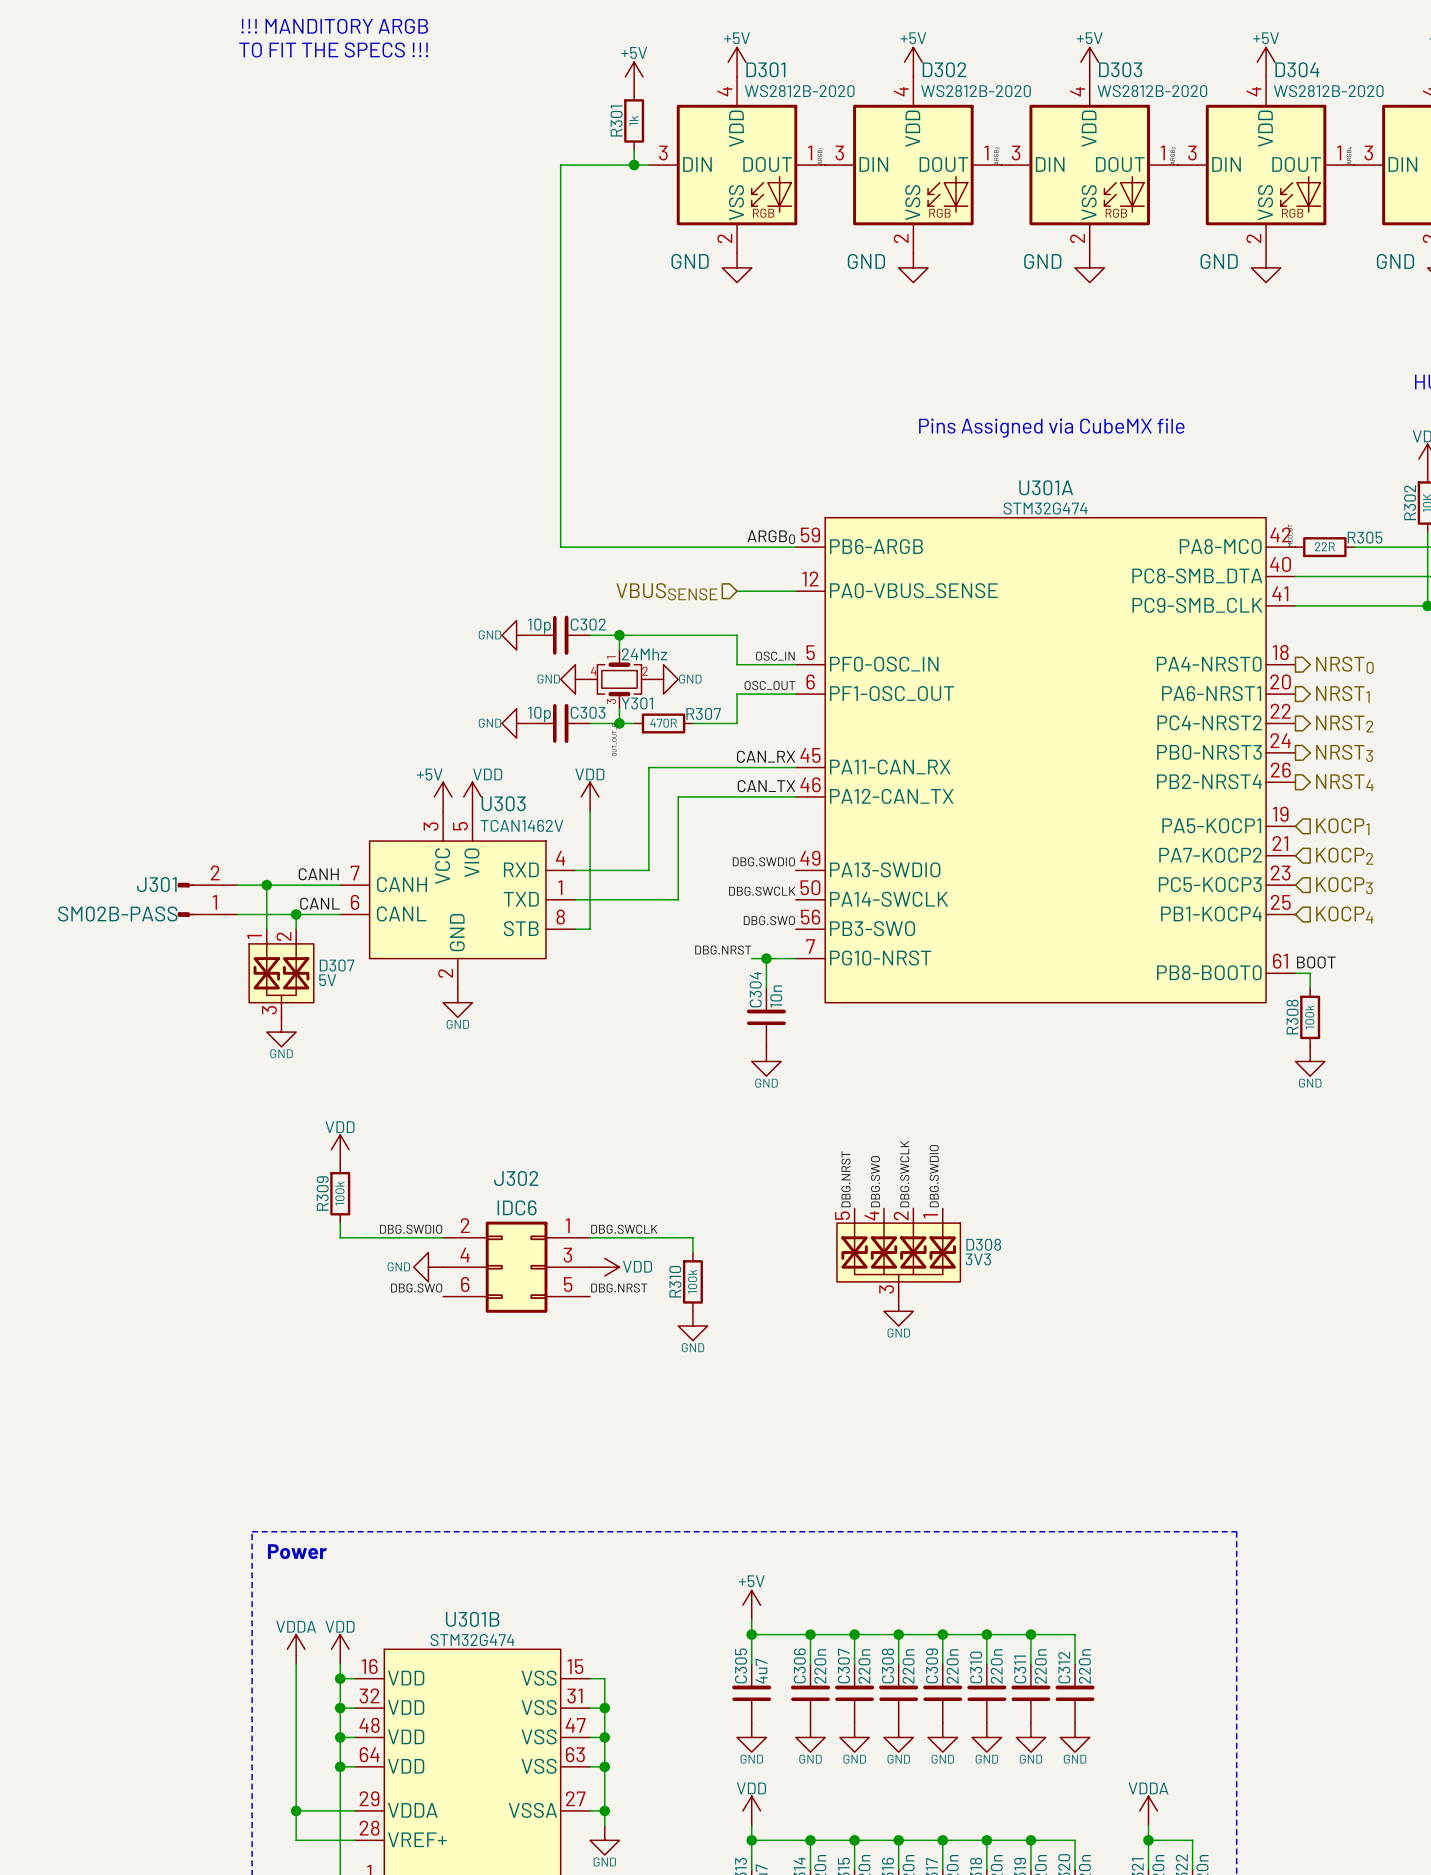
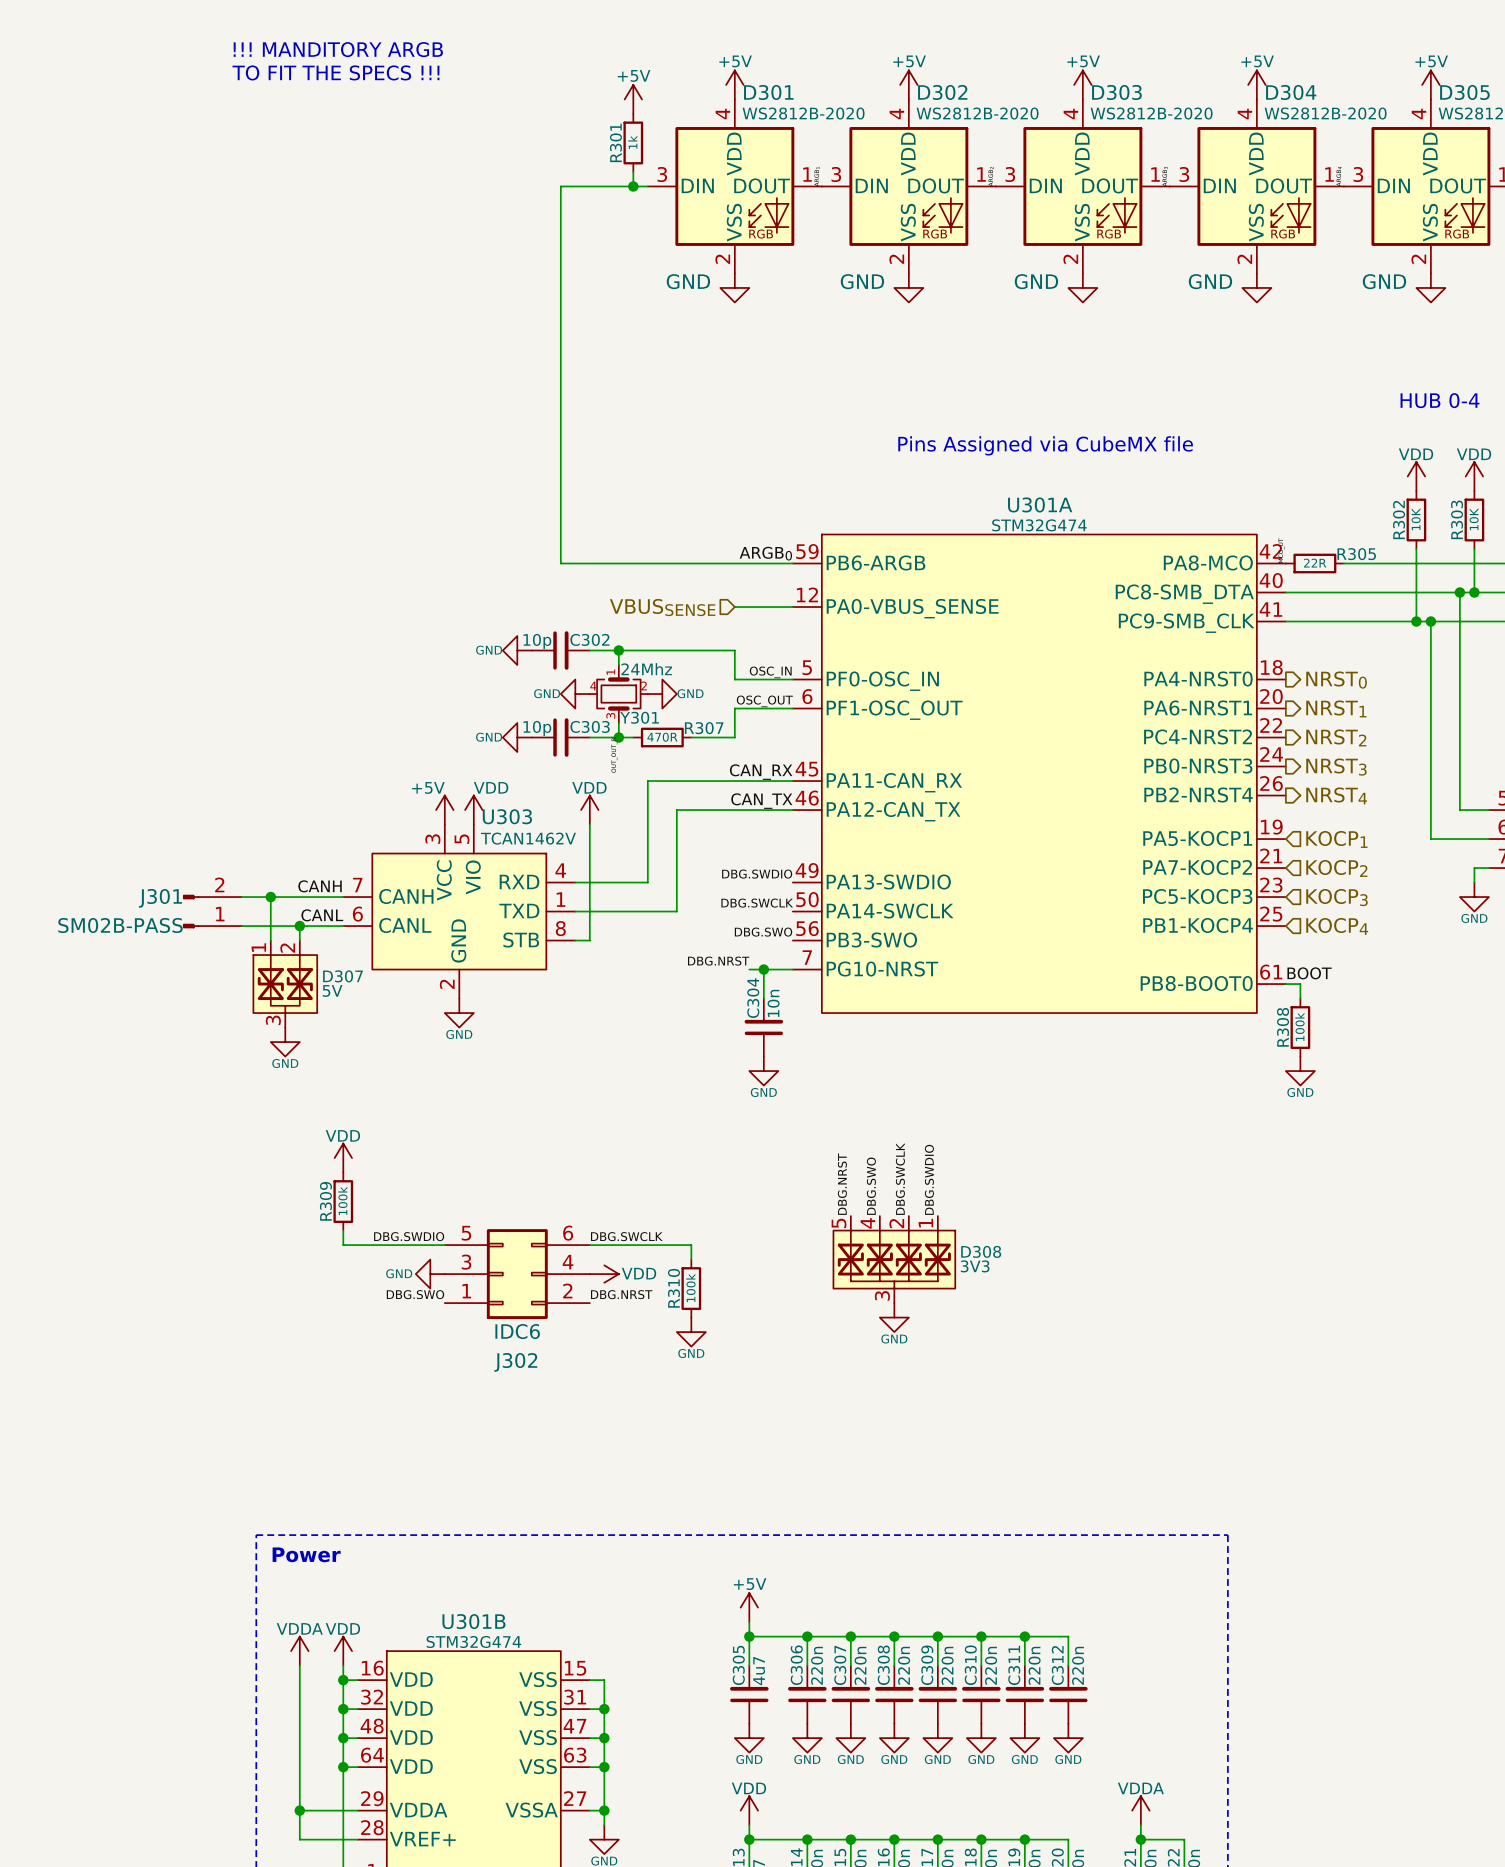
J302 rotation: 0° (516, 1267) -> 180° (517, 1274)

